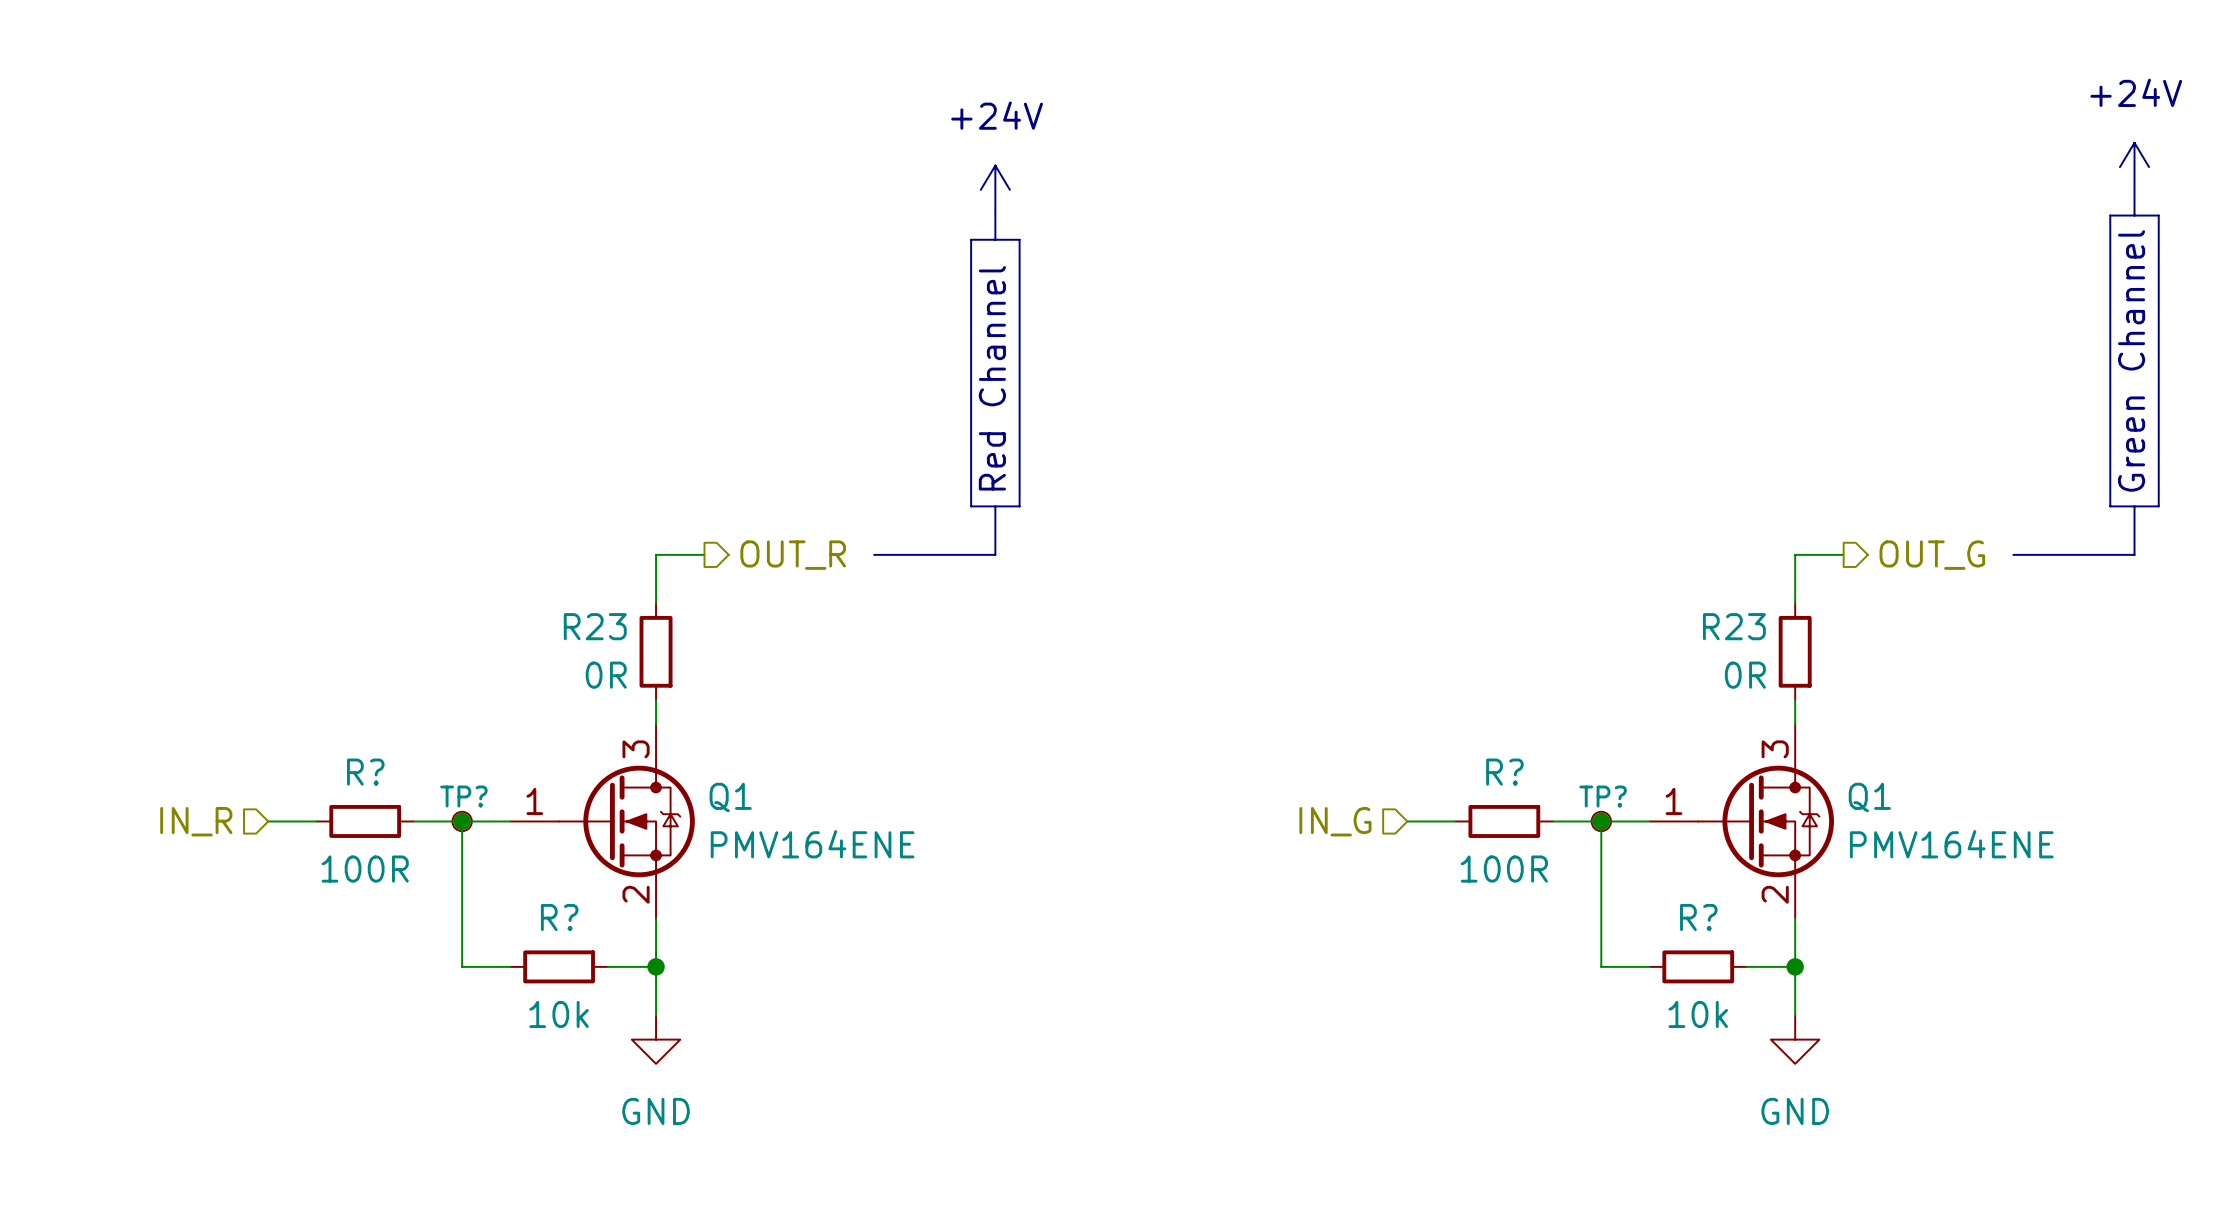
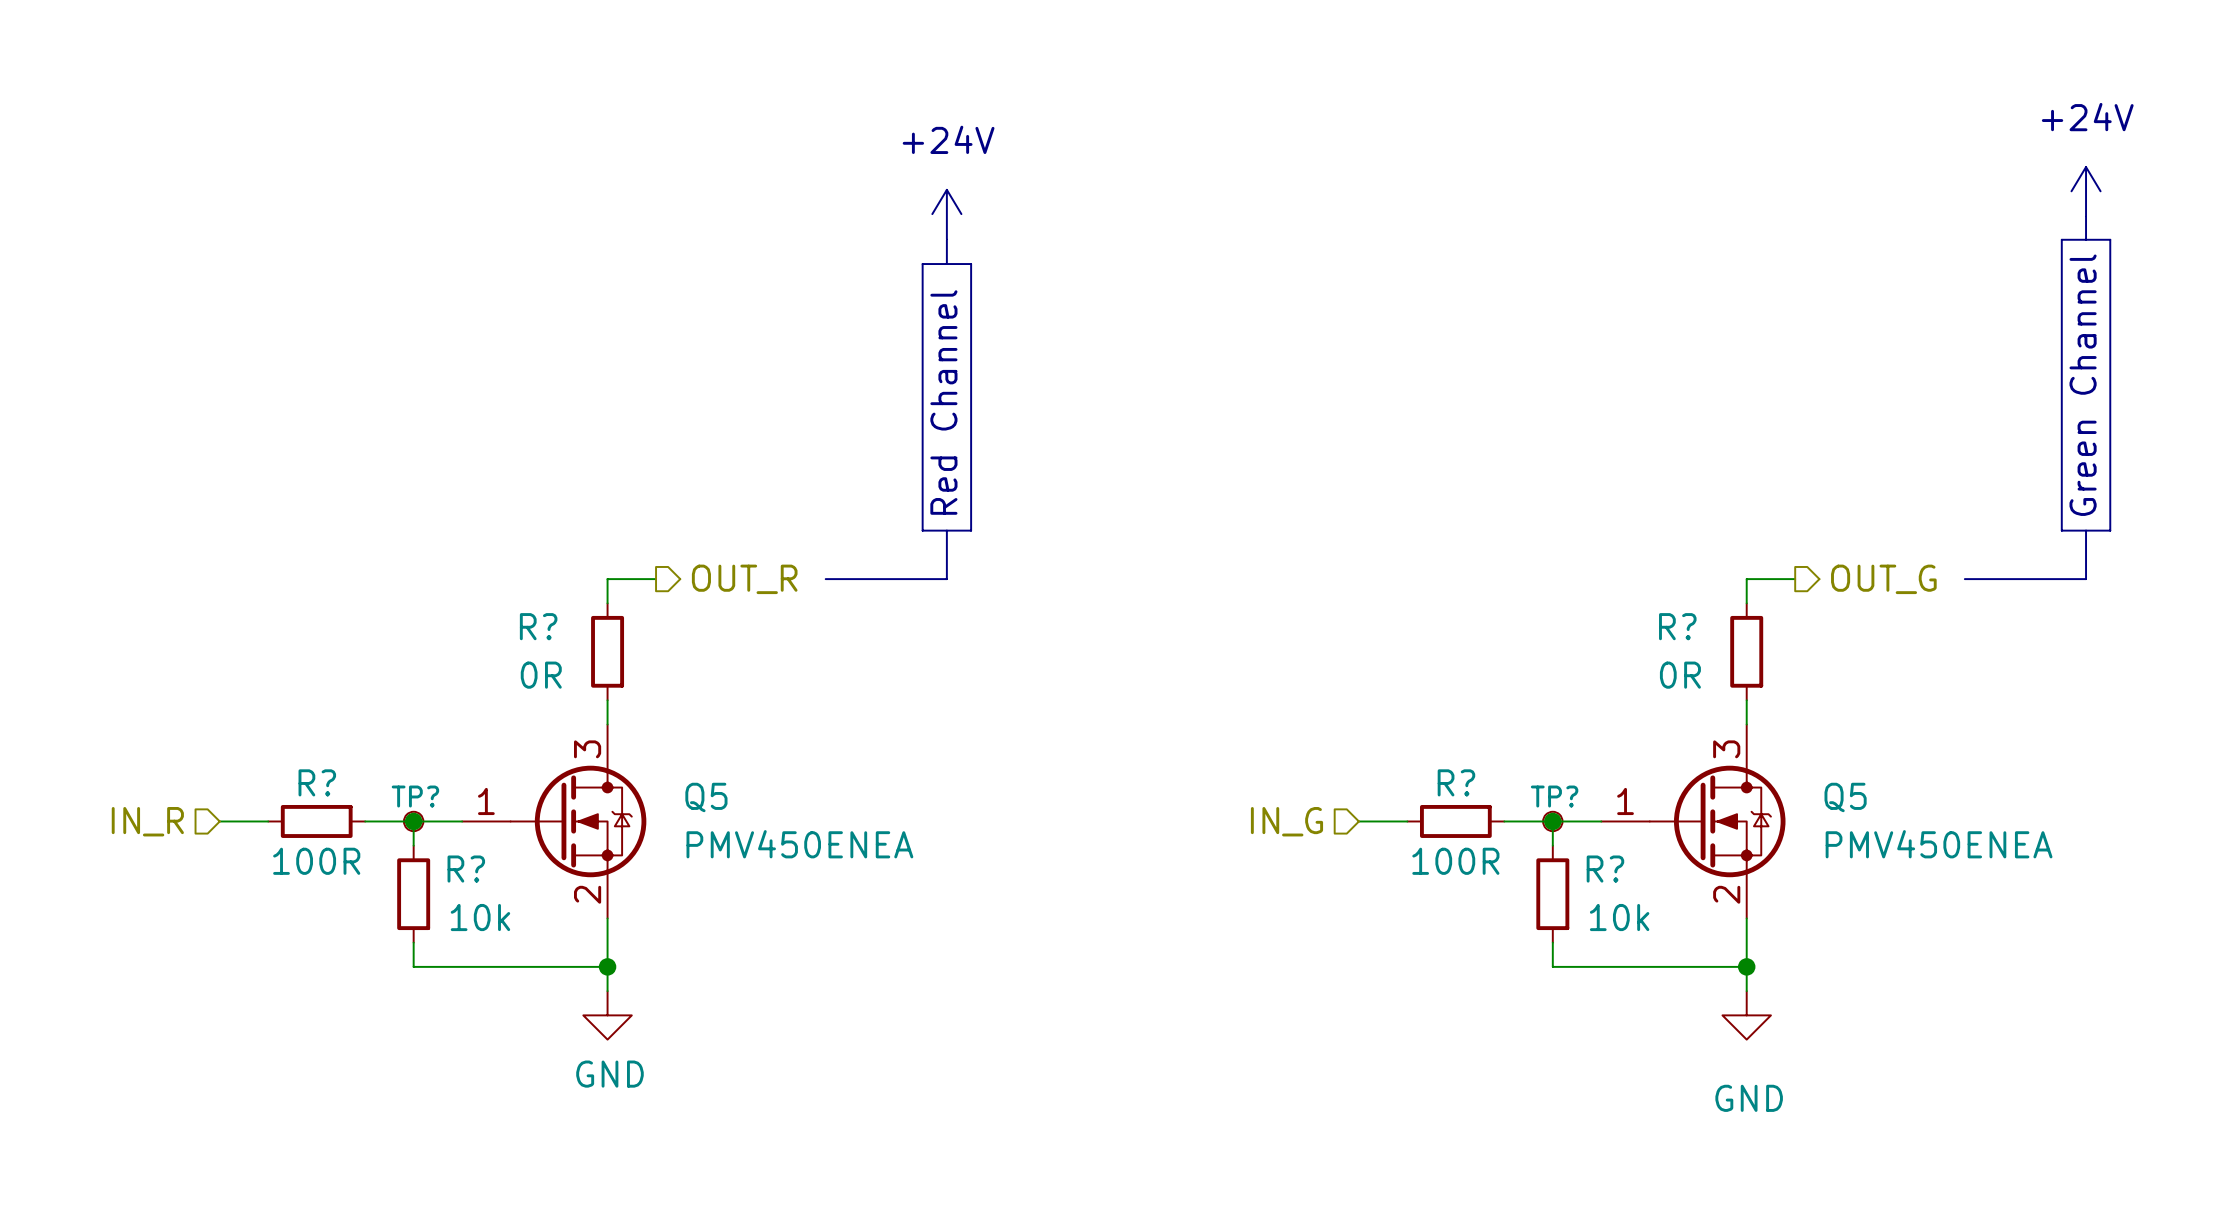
text position: +24V (2136, 92) -> +24V (2087, 117)
text position: +24V (997, 115) -> +24V (948, 139)
line: (2134, 142) (2149, 167) -> (2086, 167) (2100, 191)
line: (2134, 142) (2119, 167) -> (2086, 167) (2071, 191)
line: (2134, 142) (2134, 191) -> (2086, 167) (2086, 216)
line: (995, 165) (1009, 189) -> (946, 189) (961, 214)
line: (995, 165) (995, 214) -> (946, 189) (946, 238)
line: (995, 165) (980, 189) -> (946, 189) (932, 214)
line: (2134, 192) (2134, 215) -> (2086, 217) (2086, 239)
line: (995, 215) (995, 239) -> (946, 239) (946, 264)
line: (2110, 239) (2110, 215) (2158, 215) (2158, 506) (2110, 506) -> (2110, 239) (2061, 239) (2061, 530) (2110, 530) (2110, 506)
line: (971, 264) (971, 239) (1019, 239) (1019, 506) (971, 506) -> (971, 264) (922, 264) (922, 530) (971, 530) (971, 506)
text position: Green Channel (2131, 360) -> Green Channel (2083, 385)
text position: Red Channel (992, 378) -> Red Channel (943, 402)
line: (995, 506) (995, 554) (874, 554) -> (946, 530) (946, 579) (825, 579)
line: (2134, 506) (2134, 554) (2013, 554) -> (2086, 530) (2086, 579) (1964, 579)
wire: (704, 554) (656, 554) (656, 603) -> none
wire: (1843, 554) (1795, 554) (1795, 603) -> none
hierarchical label position: OUT_R (793, 555) -> OUT_R (744, 579)
hierarchical label position: OUT_G (1932, 555) -> OUT_G (1883, 579)
wire: none -> (656, 579) (607, 579) (607, 603)
wire: none -> (1795, 579) (1746, 579) (1746, 603)
R?: none -> 0R (607, 651)
R23: 0R (656, 651) -> none
R?: none -> 0R (1746, 651)
R23: 0R (1795, 651) -> none
wire: (656, 700) (656, 724) -> (607, 700) (607, 724)
wire: (1795, 700) (1795, 724) -> (1746, 700) (1746, 724)
R? name position: R? (365, 772) -> R? (317, 782)
R? name position: R? (1504, 772) -> R? (1456, 782)
hierarchical label position: IN_R (196, 821) -> IN_R (147, 821)
wire: (268, 821) (316, 821) -> (268, 821) (219, 821)
wire: none -> (365, 821) (413, 821) (413, 845)
R? position: (365, 821) -> (316, 821)
junction position: (462, 821) -> (413, 821)
TP? position: (462, 821) -> (413, 821)
wire: (510, 821) (462, 821) (462, 966) -> (413, 942) (413, 966) (462, 966)
Q5: none -> PMV450ENEA (554, 821)
Q1: PMV164ENE (602, 821) -> none
hierarchical label position: IN_G (1335, 821) -> IN_G (1286, 821)
wire: (1407, 821) (1455, 821) -> (1407, 821) (1358, 821)
wire: none -> (1504, 821) (1552, 821) (1552, 845)
R? position: (1504, 821) -> (1455, 821)
junction position: (1601, 821) -> (1552, 821)
TP? position: (1601, 821) -> (1552, 821)
wire: (1649, 821) (1601, 821) (1601, 966) -> (1552, 942) (1552, 966) (1601, 966)
Q5: none -> PMV450ENEA (1693, 821)
Q1: PMV164ENE (1741, 821) -> none
R? value position: 100R (365, 869) -> 100R (316, 861)
R? value position: 100R (1504, 869) -> 100R (1455, 861)
wire: none -> (607, 918) (607, 991)
wire: (656, 918) (656, 1015) -> none
wire: none -> (1746, 918) (1746, 991)
wire: (1795, 918) (1795, 1015) -> none
R? rotation: 0° (559, 966) -> 90° clockwise (413, 894)
R? position: (559, 966) -> (413, 894)
wire: (607, 966) (656, 966) -> (607, 966) (510, 966)
junction position: (656, 966) -> (607, 966)
R? rotation: 0° (1698, 966) -> 90° clockwise (1552, 894)
R? position: (1698, 966) -> (1552, 894)
wire: (1746, 966) (1795, 966) -> (1746, 966) (1649, 966)
junction position: (1795, 966) -> (1746, 966)
R? value position: 10k (559, 1014) -> 10k (480, 917)
R? value position: 10k (1698, 1014) -> 10k (1619, 917)
power symbol position: GND (656, 1039) -> GND (607, 1015)
power symbol position: GND (1795, 1039) -> GND (1746, 1015)
power symbol text position: GND (656, 1111) -> GND (609, 1074)
power symbol text position: GND (1795, 1111) -> GND (1749, 1098)

